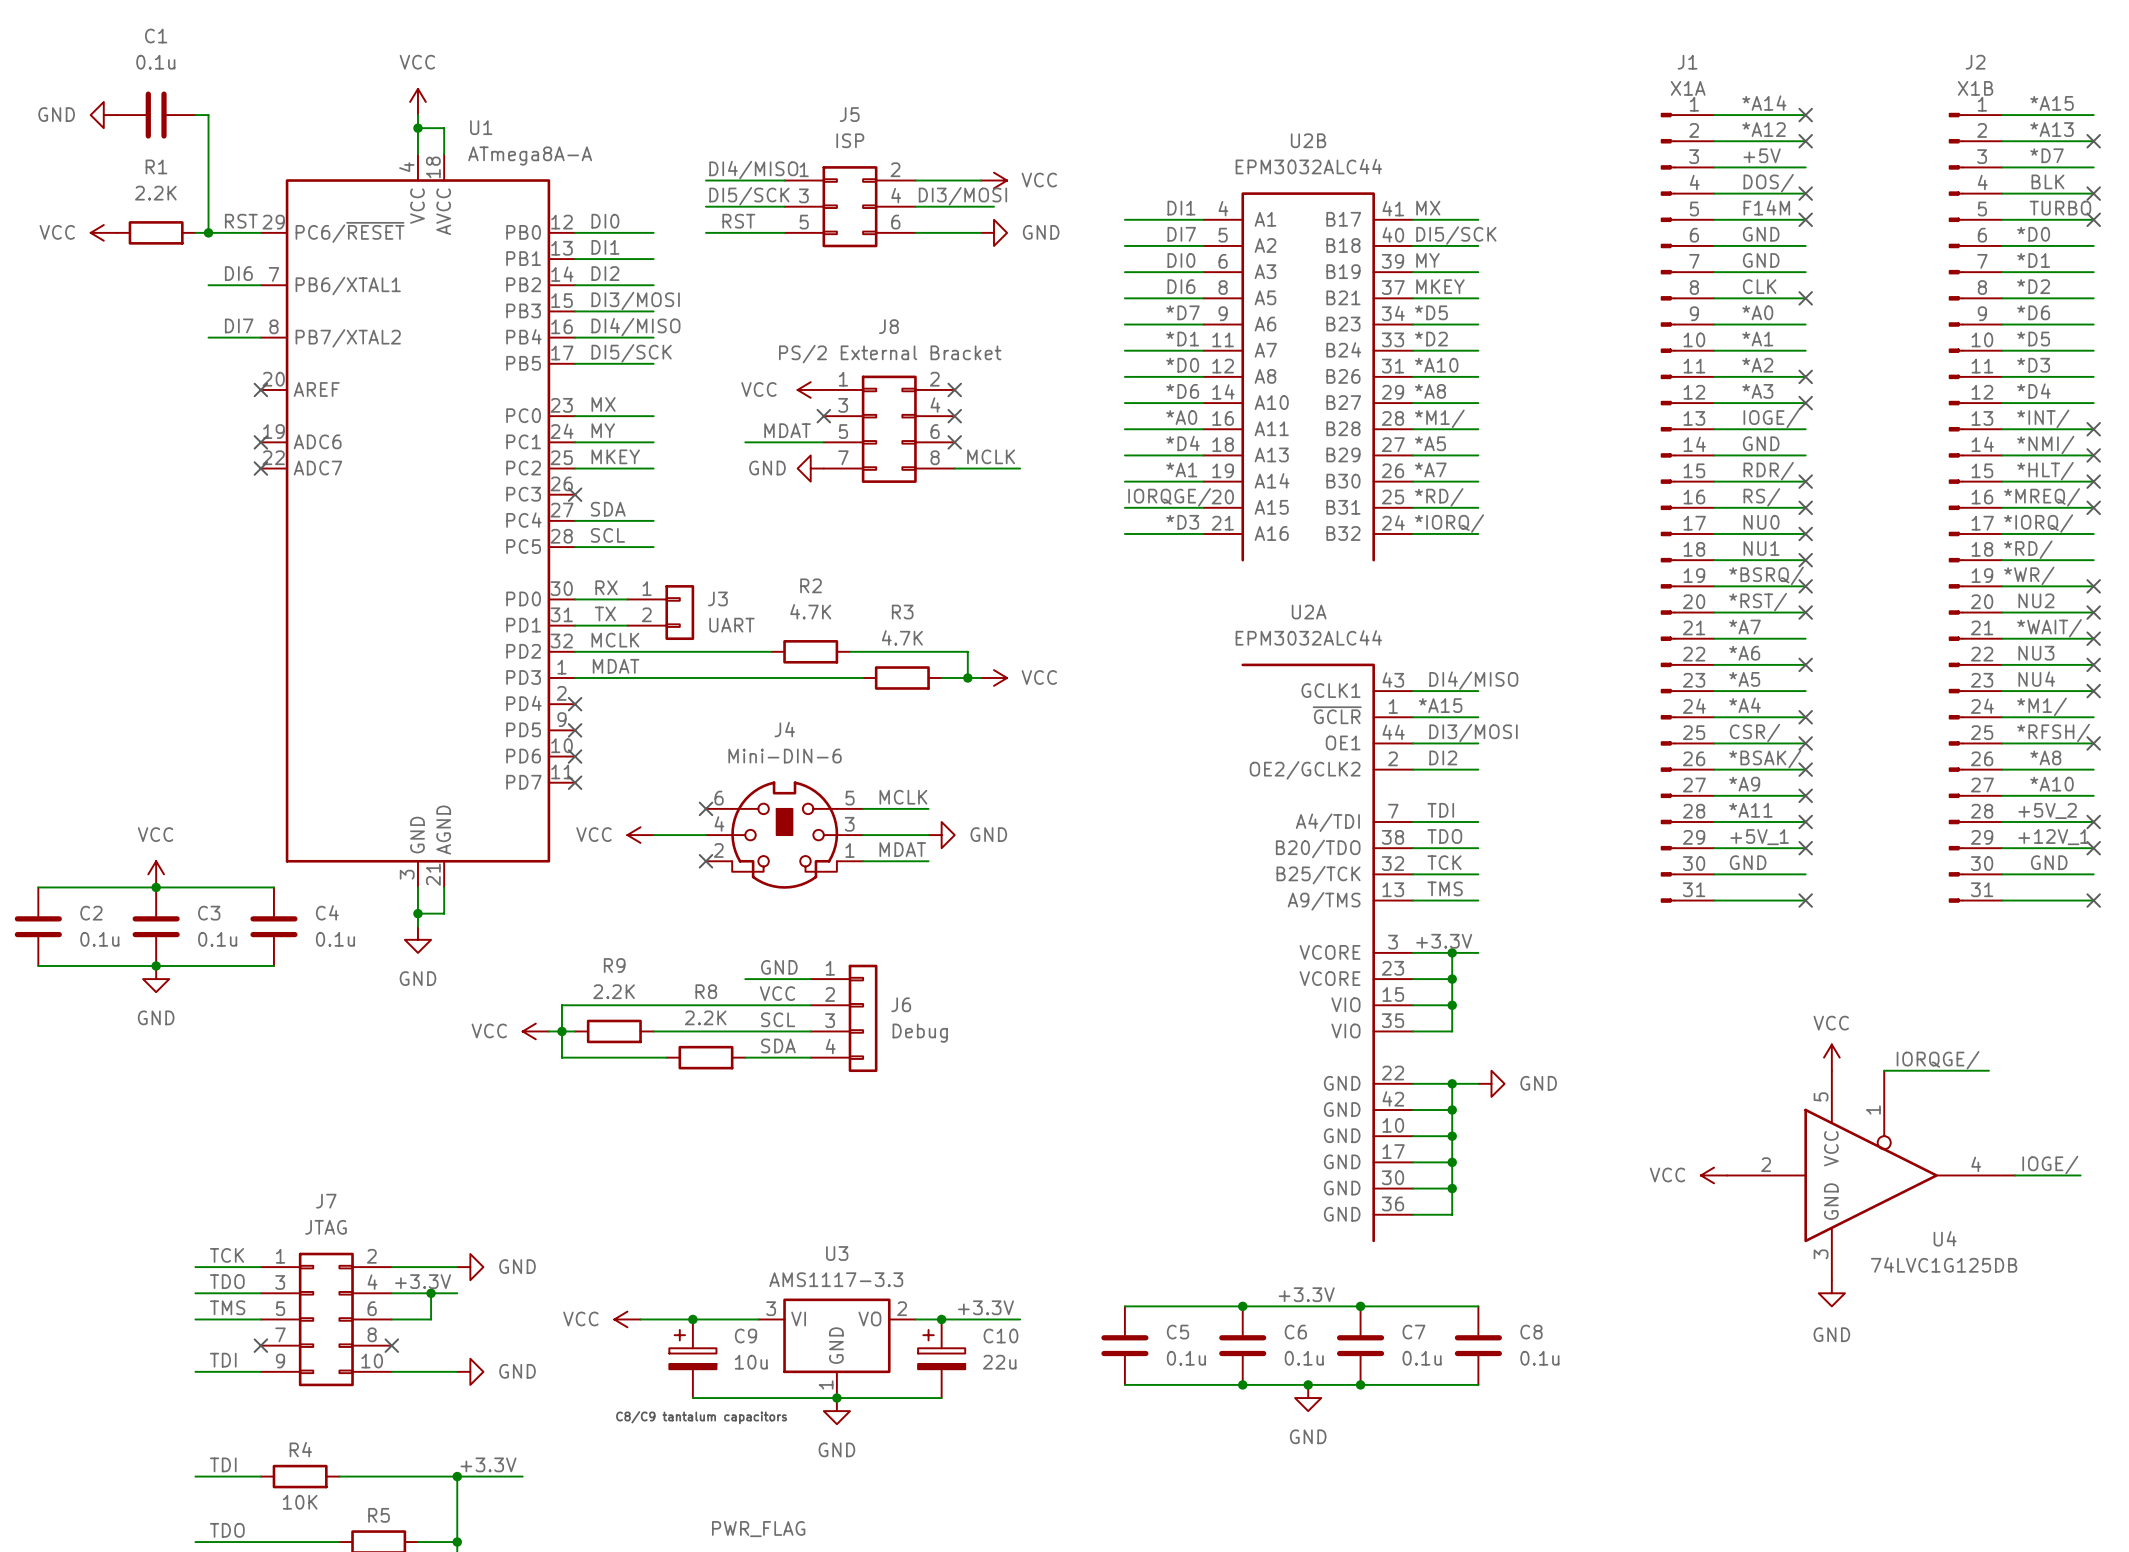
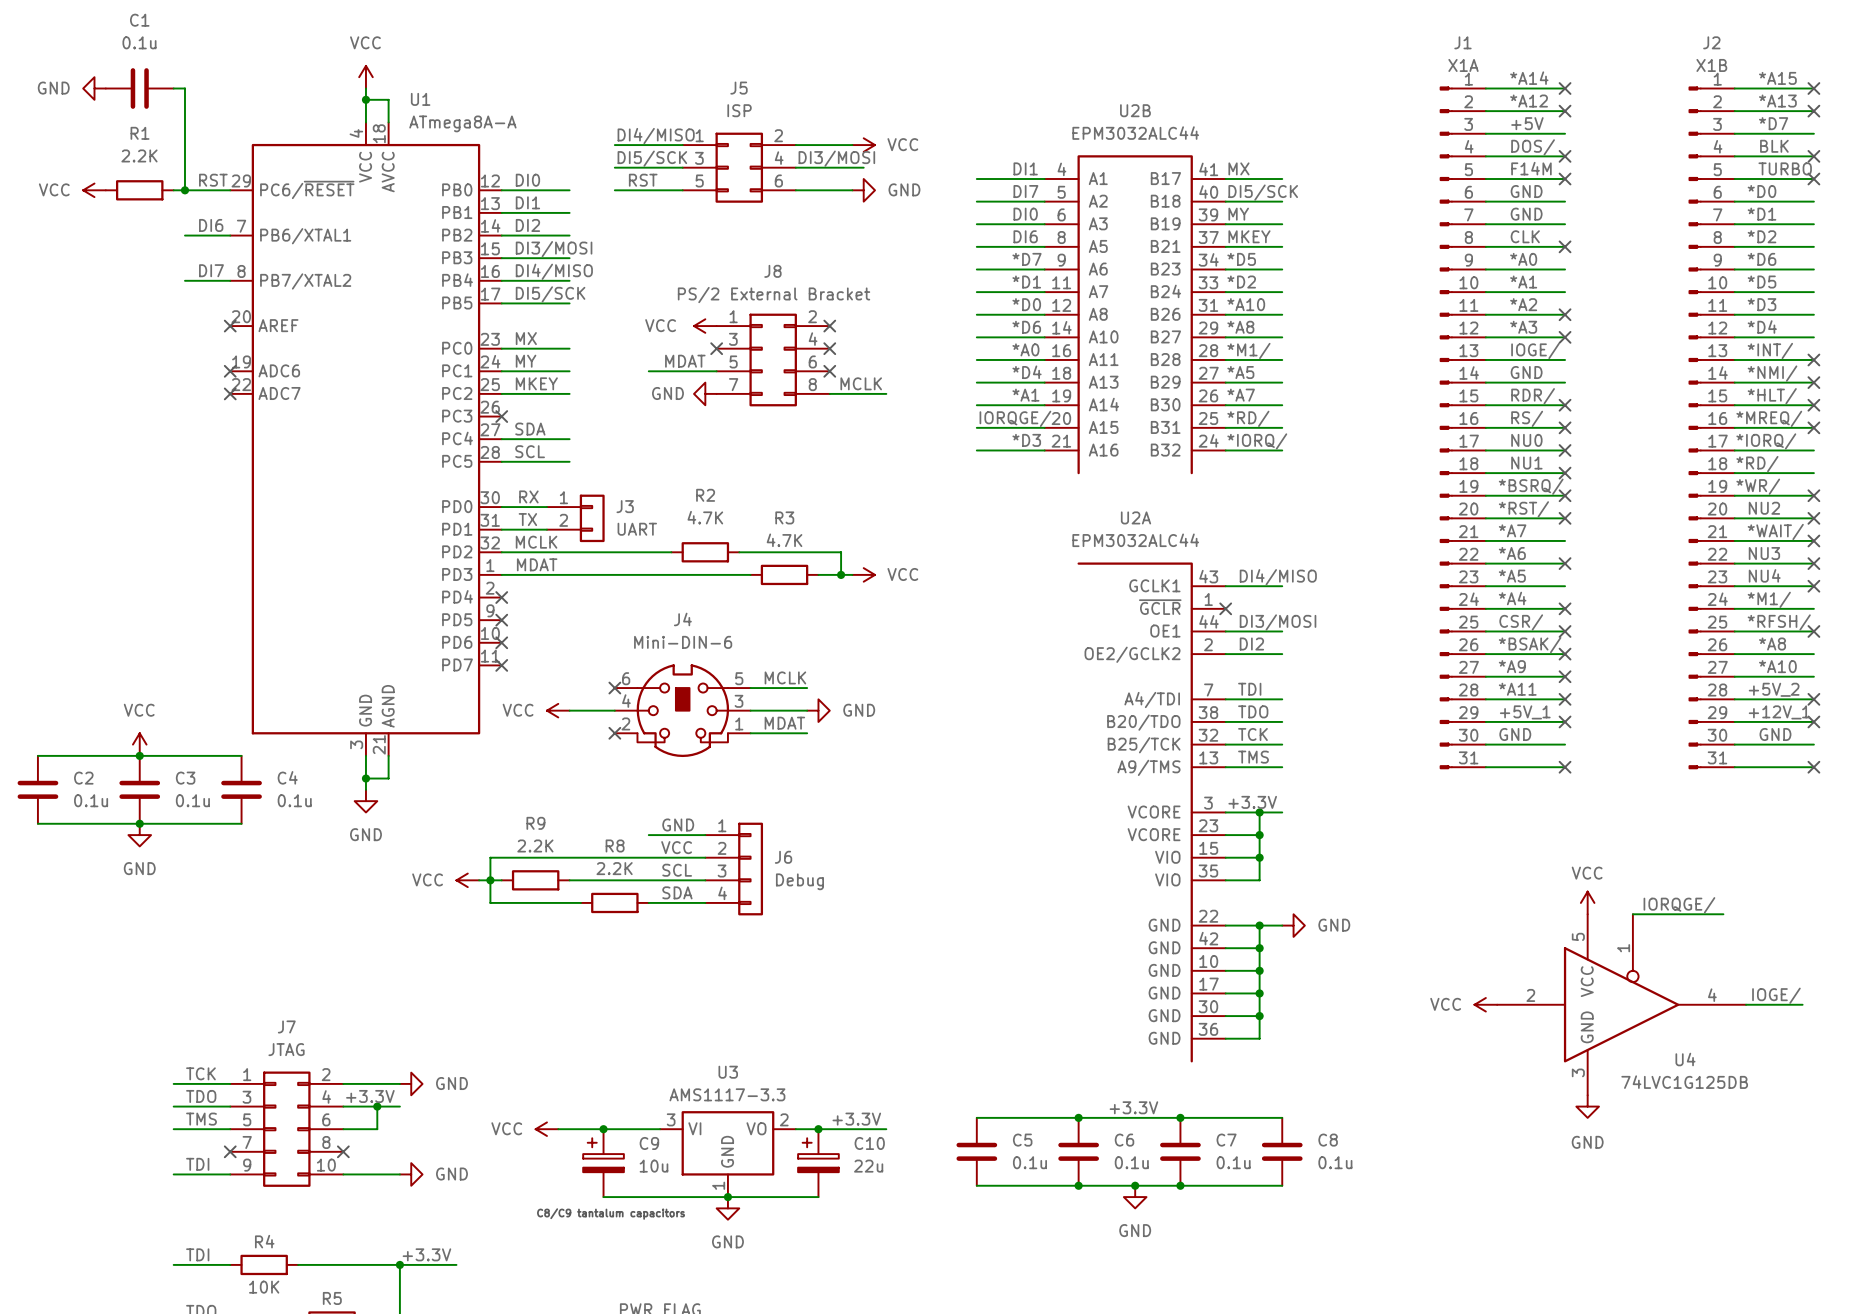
no-connect mark: none -> (1813, 88)
label: *A15 (1440, 705) -> none
wire: (1412, 717) (1478, 717) -> none
no-connect mark: none -> (1225, 608)

